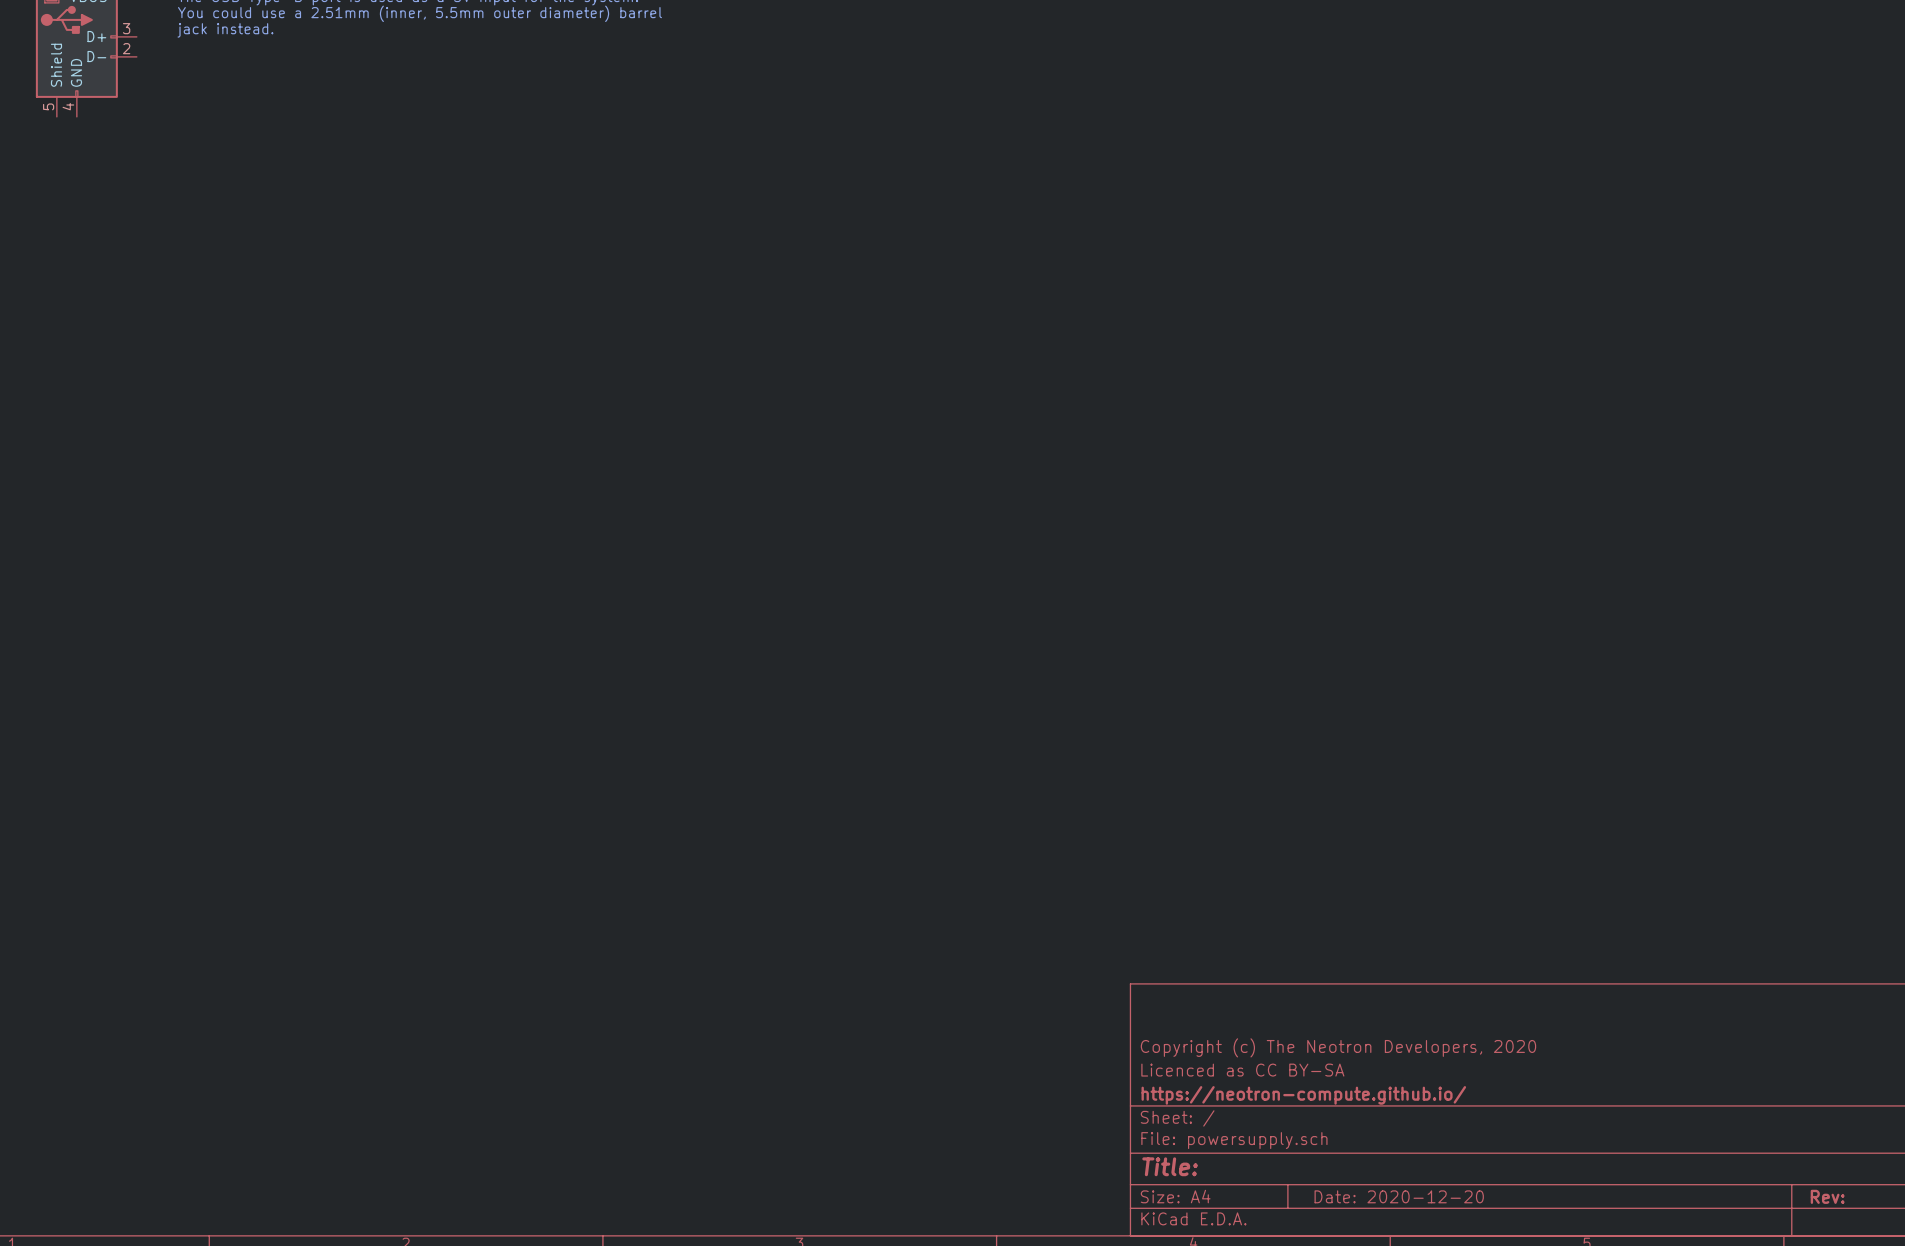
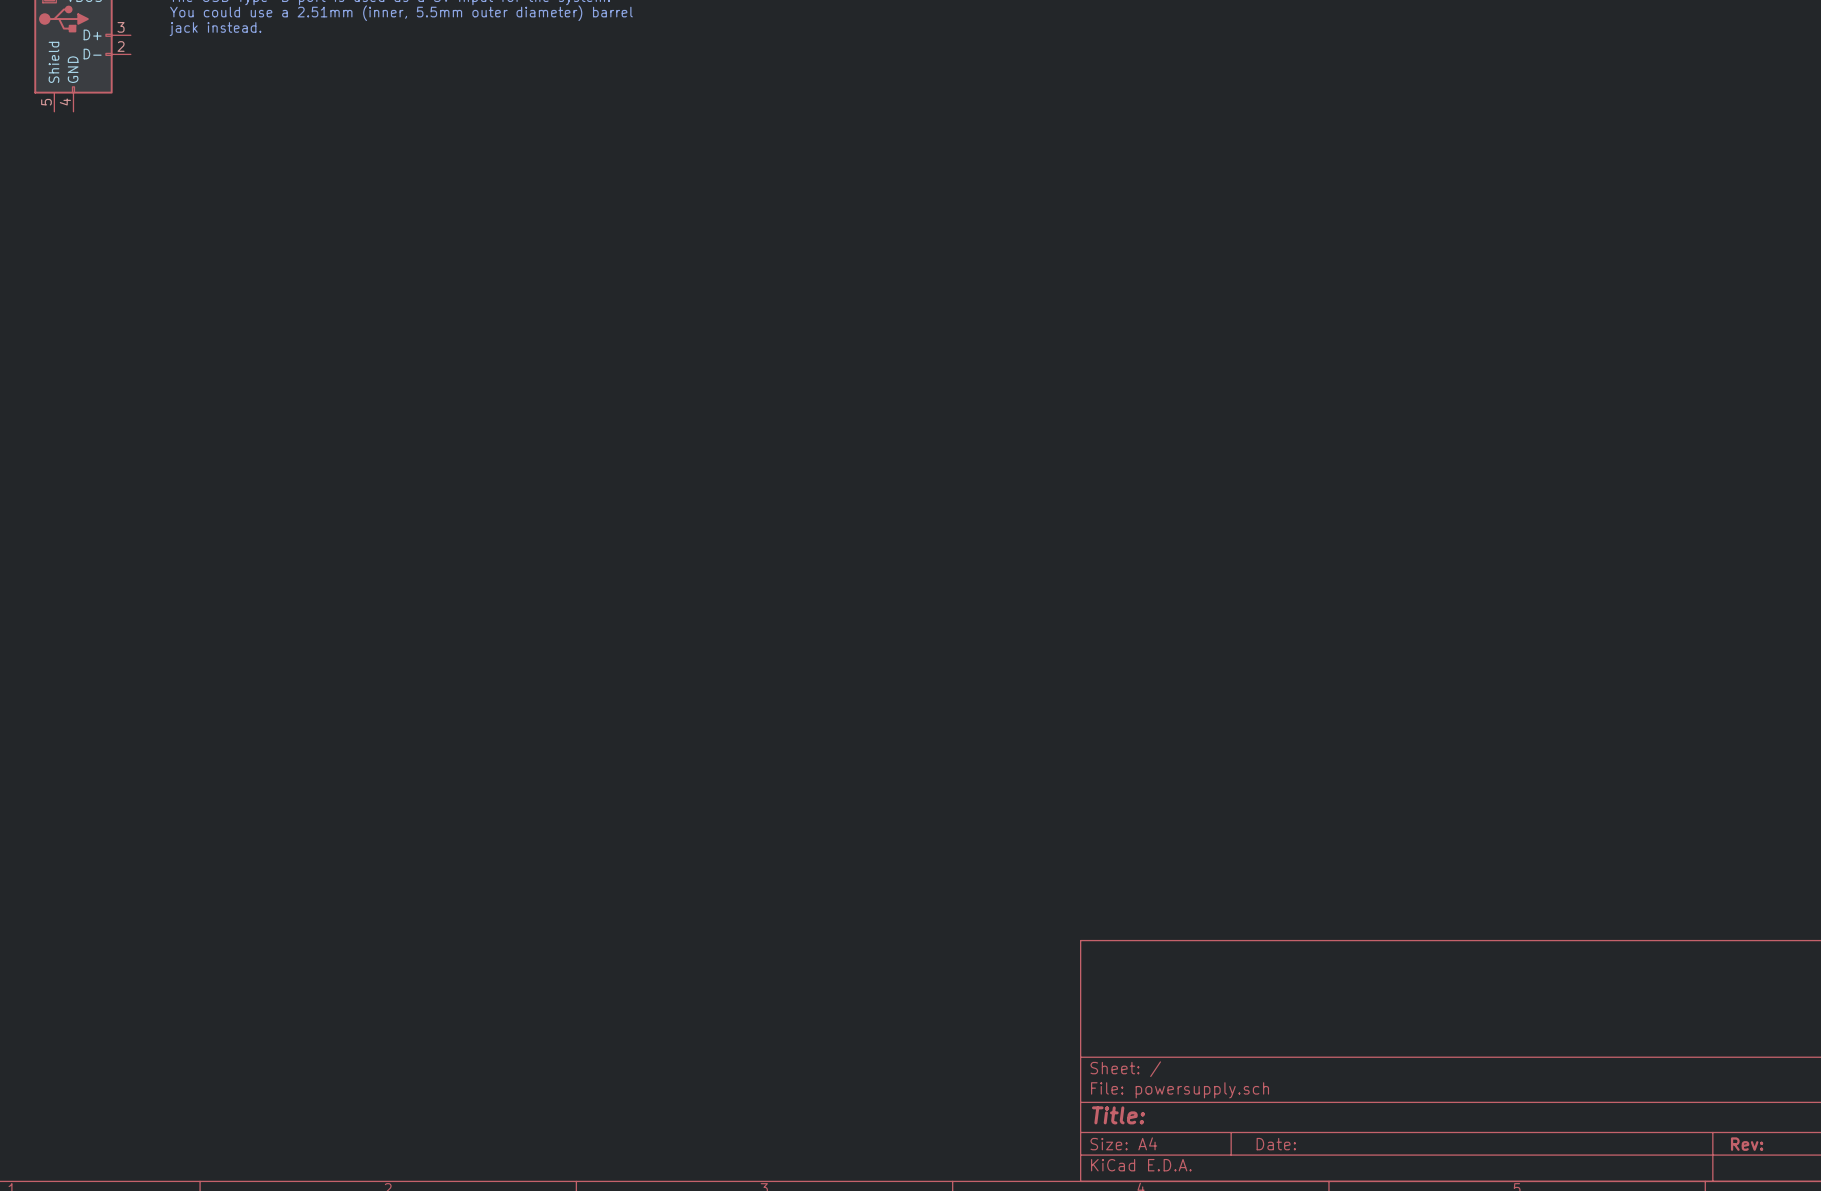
title block: Copyright (c) The Neotron Developers, 2020 (1338, 1047) -> none
title block: Licenced as CC BY-SA (1242, 1070) -> none
title block: https://neotron-compute.github.io/ (1303, 1095) -> none
title block: Date: 2020-12-20 (1399, 1196) -> Date: (1276, 1144)

